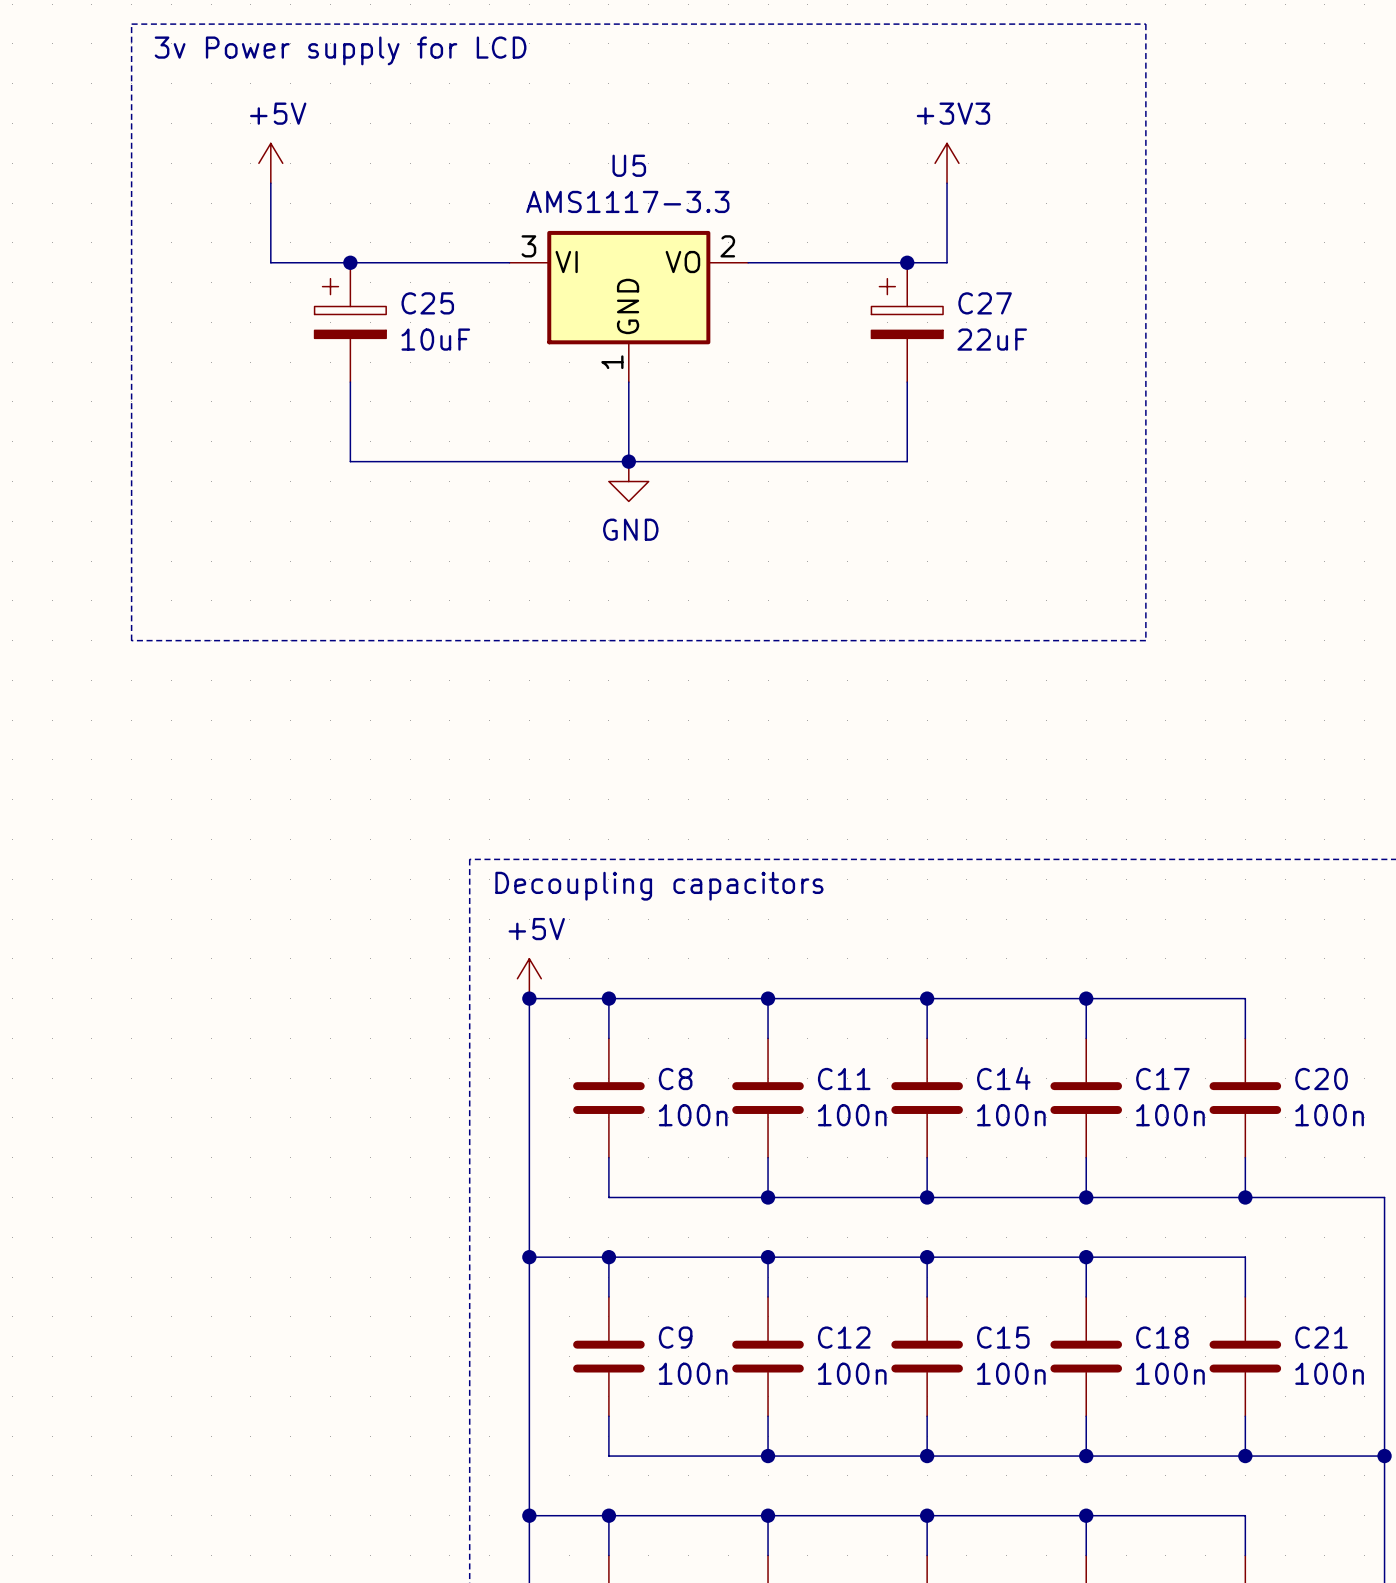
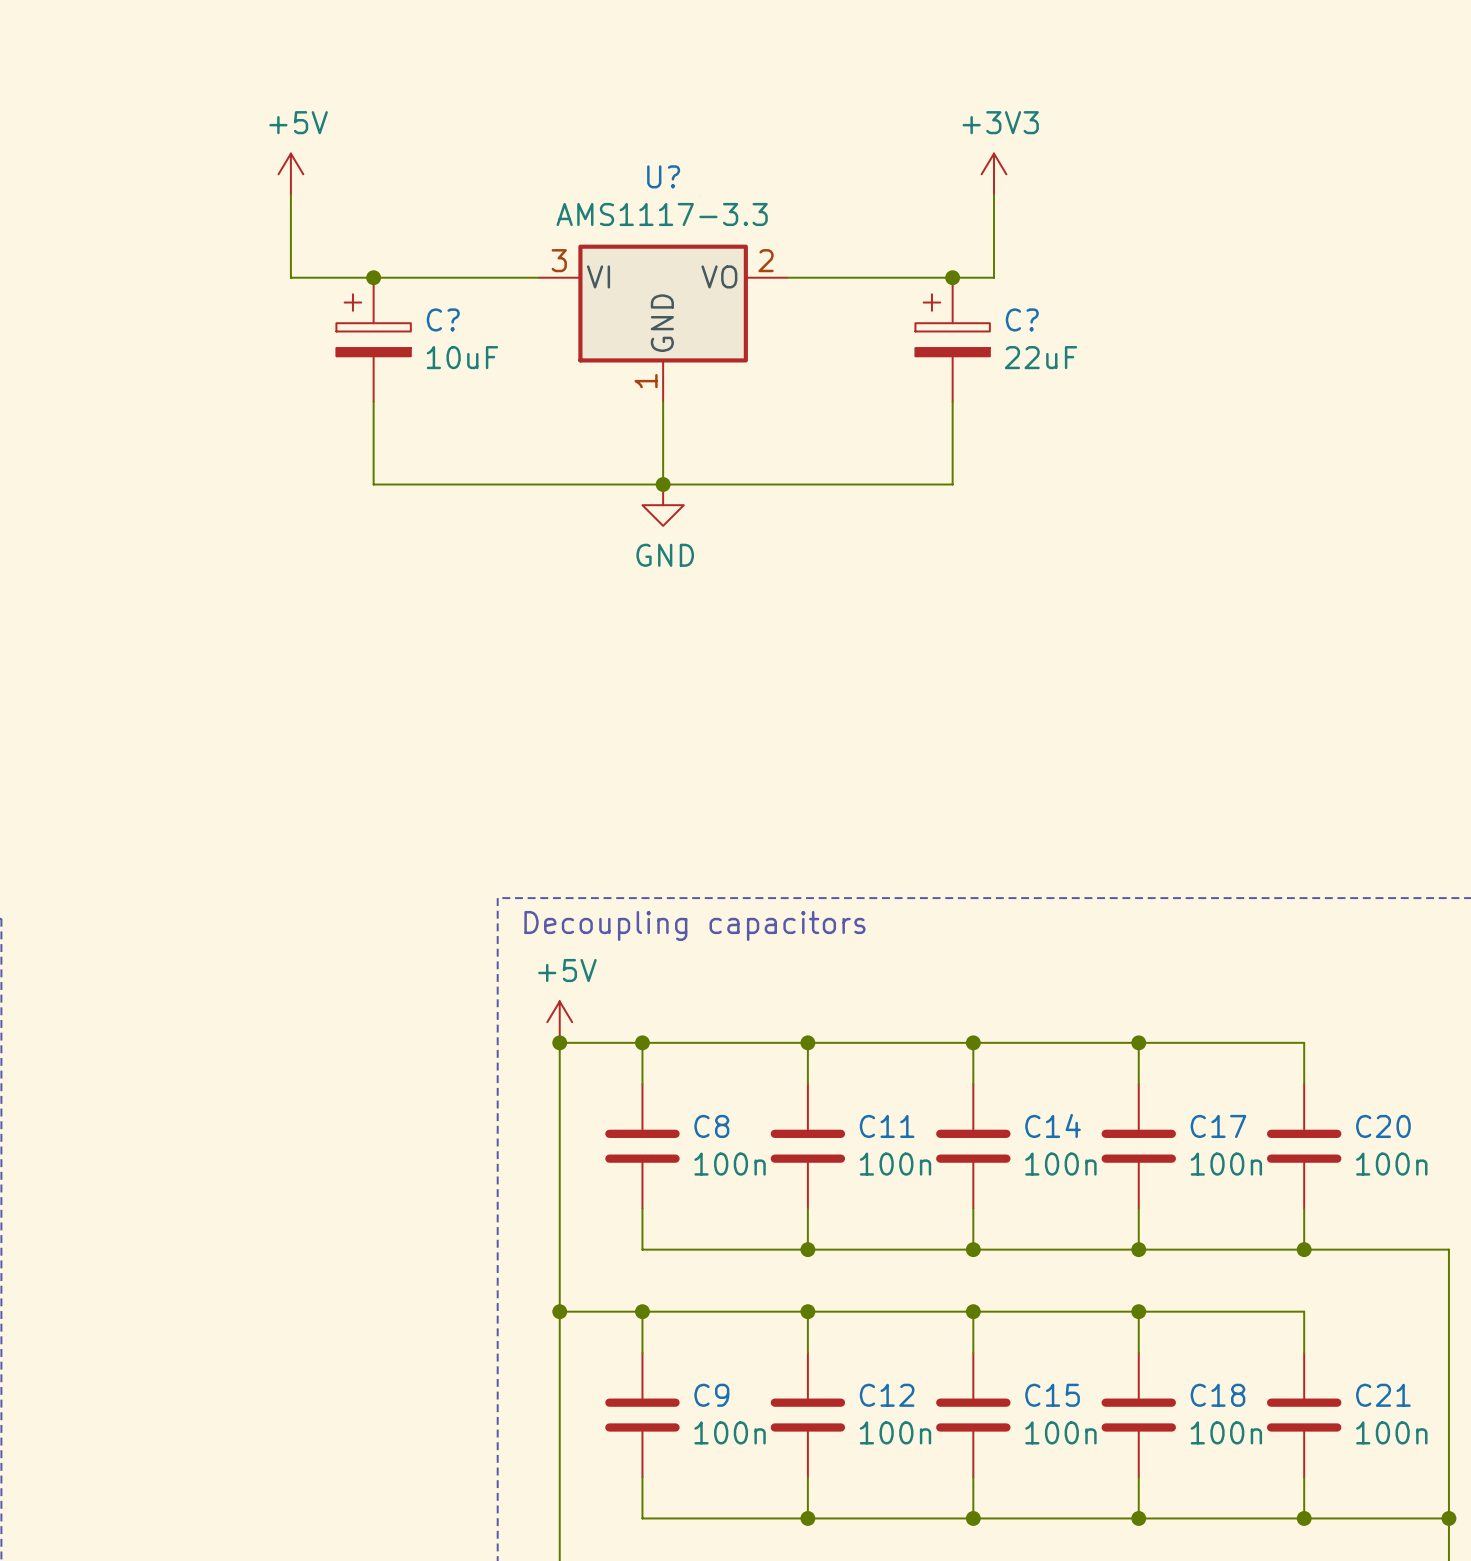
line: (131, 24) (1145, 24) (1145, 640) (131, 640) (131, 24) -> none
text: 3v Power supply for LCD (340, 50) -> none
U5 name: U5 (629, 165) -> U? (663, 176)
C25 name: C25 (427, 303) -> C? (443, 319)
C27 name: C27 (985, 303) -> C? (1022, 319)

